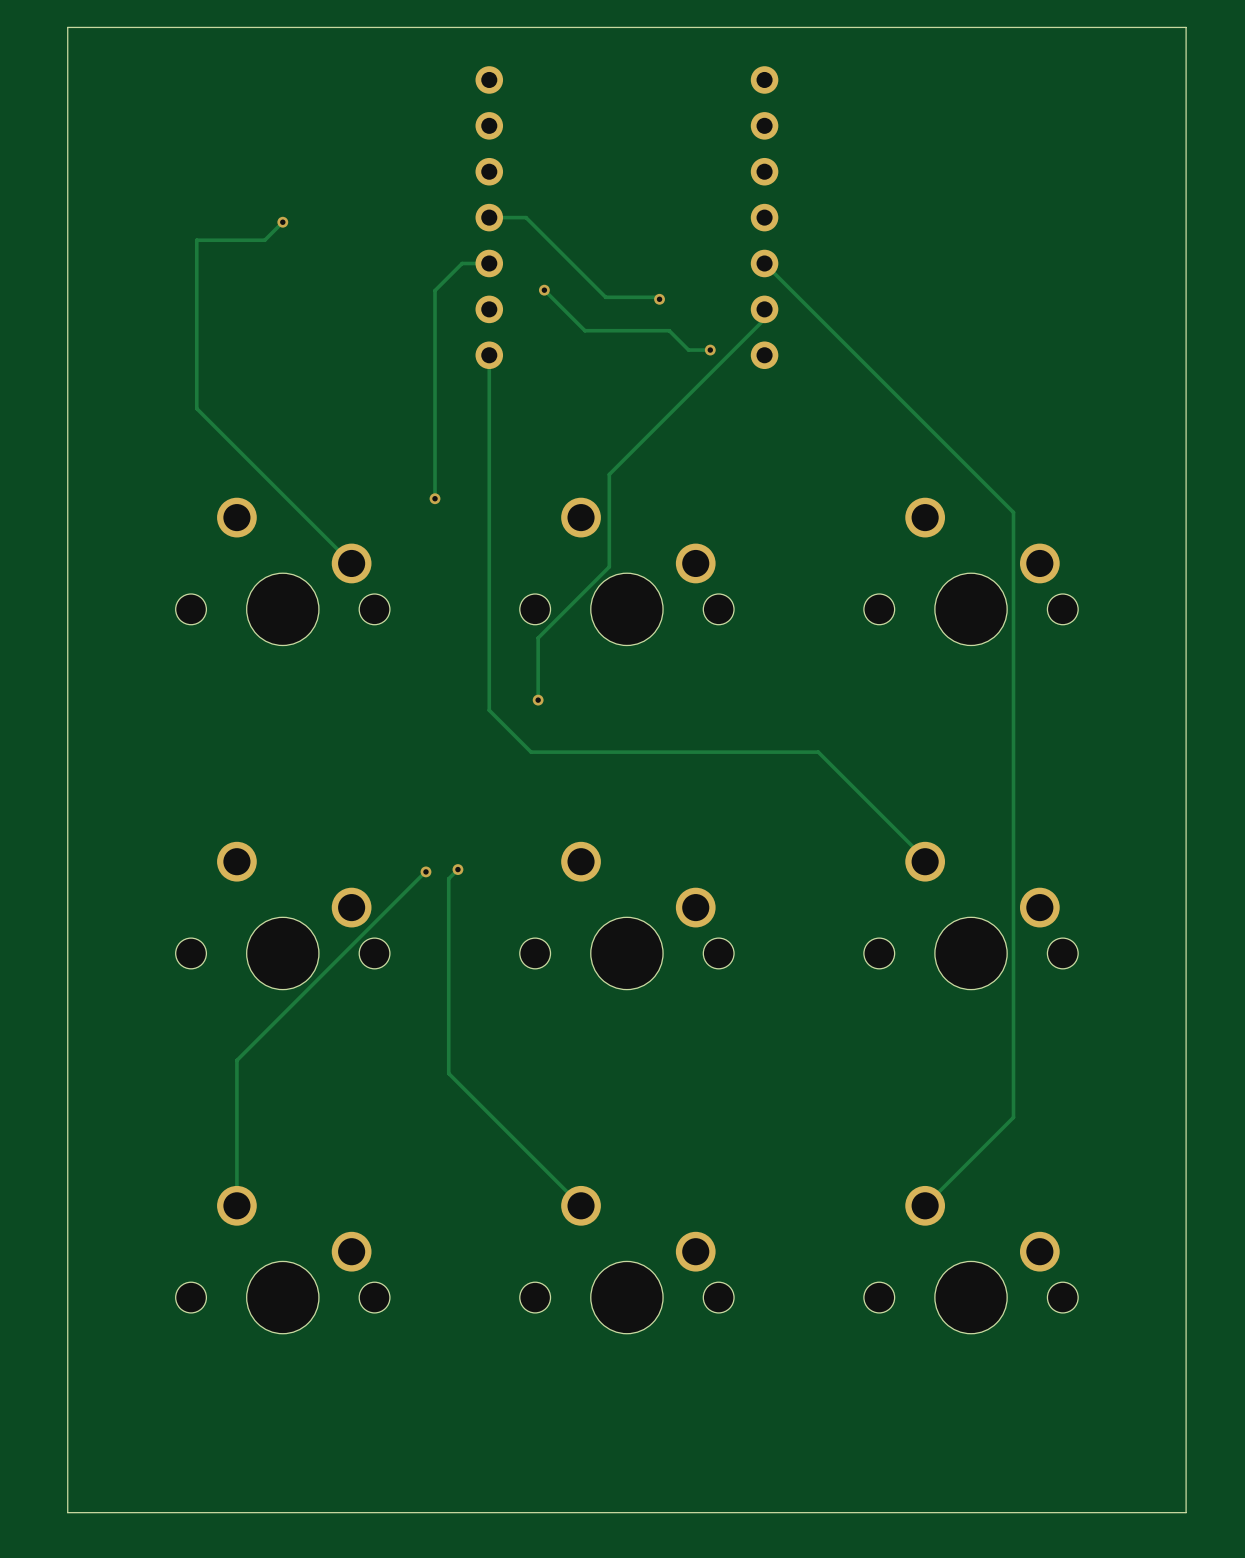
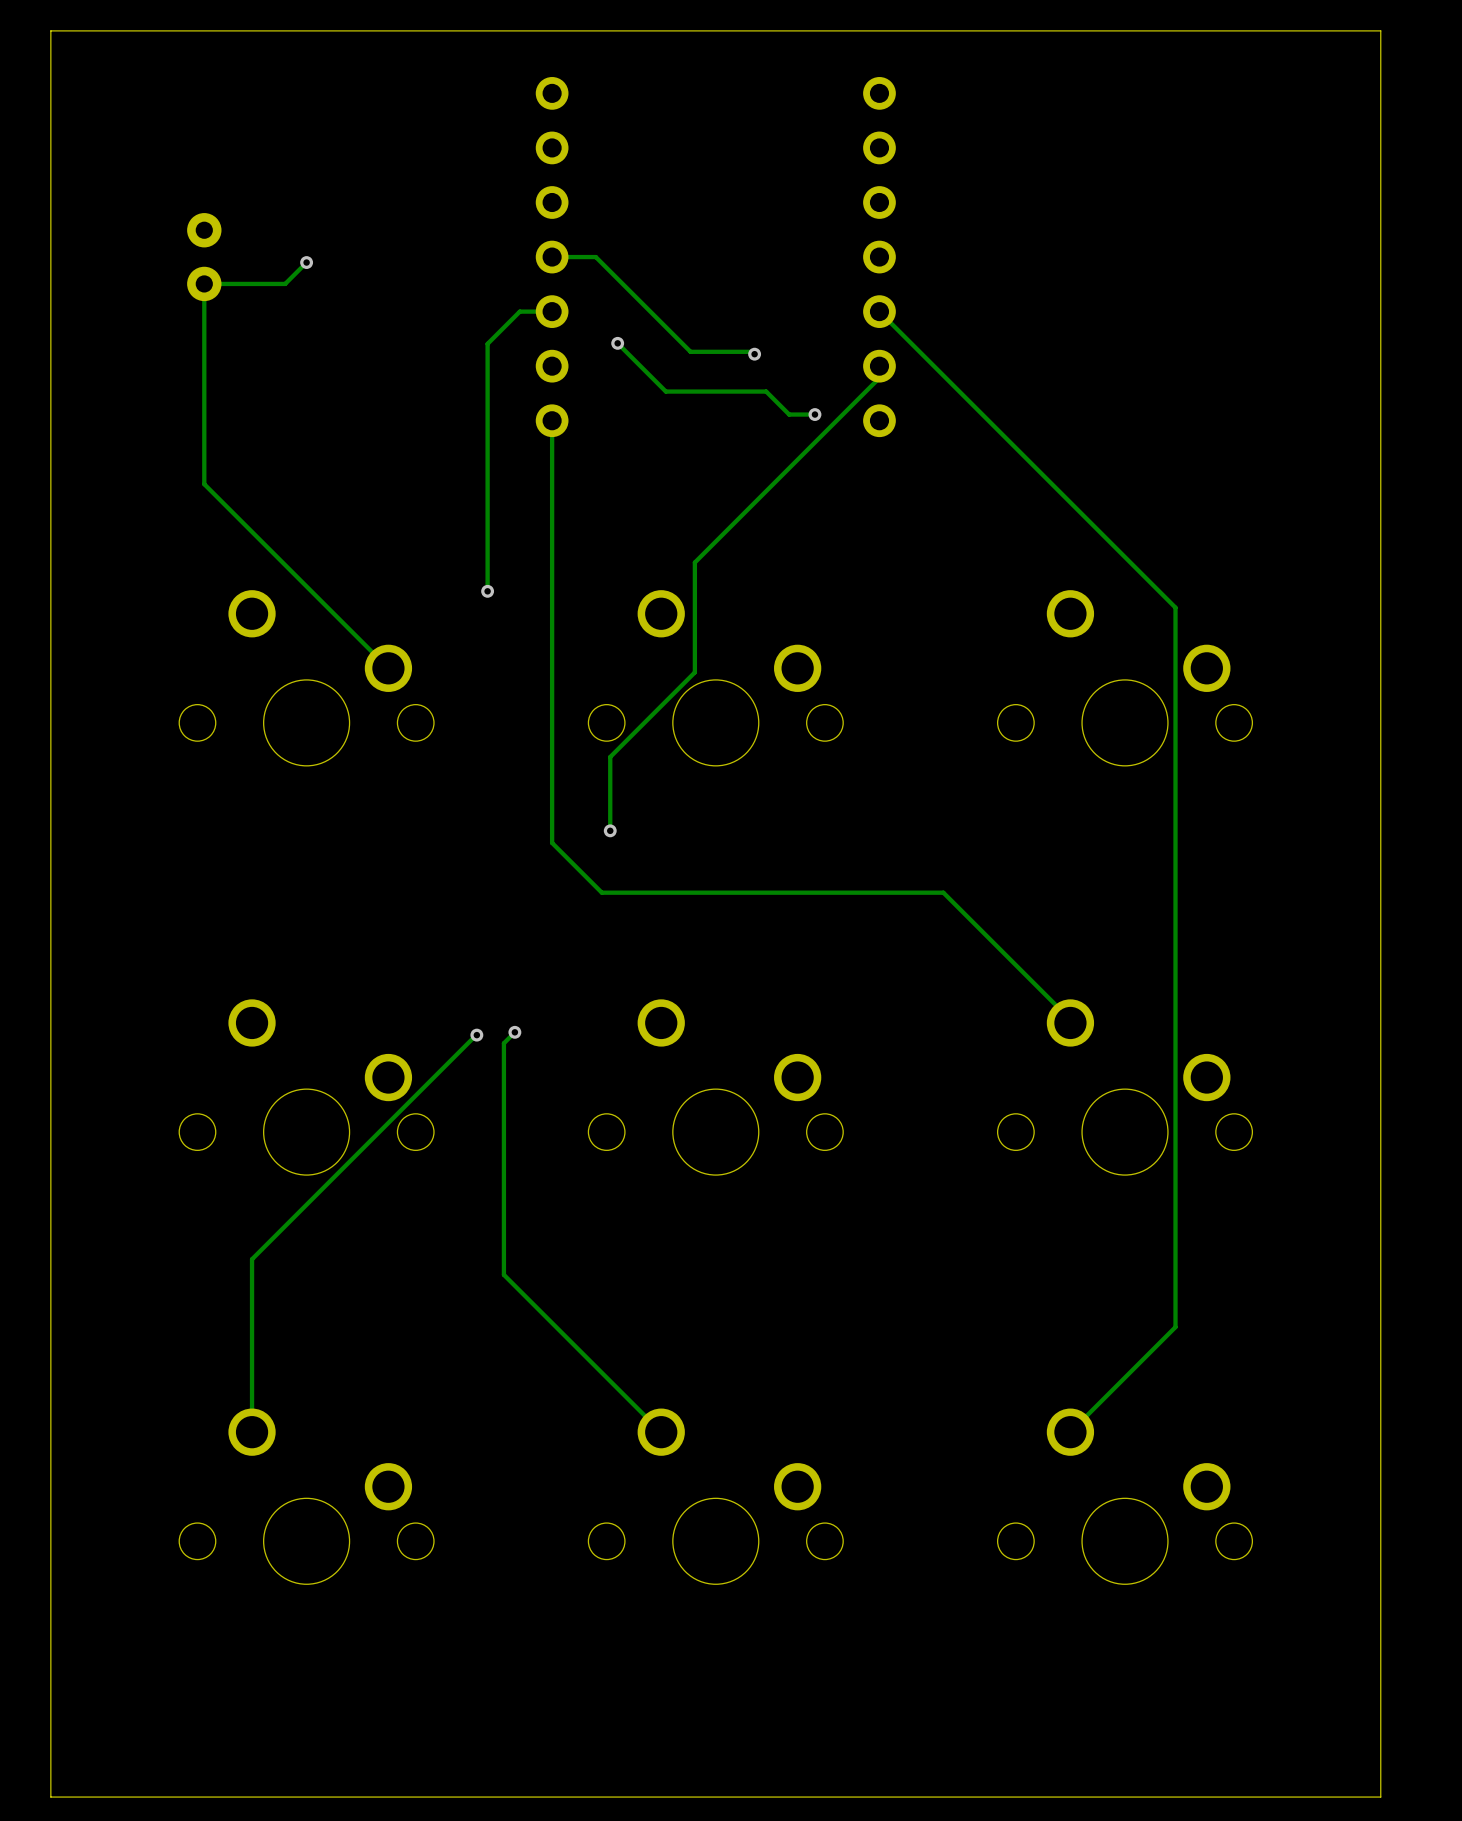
part: none -> (204, 257)

